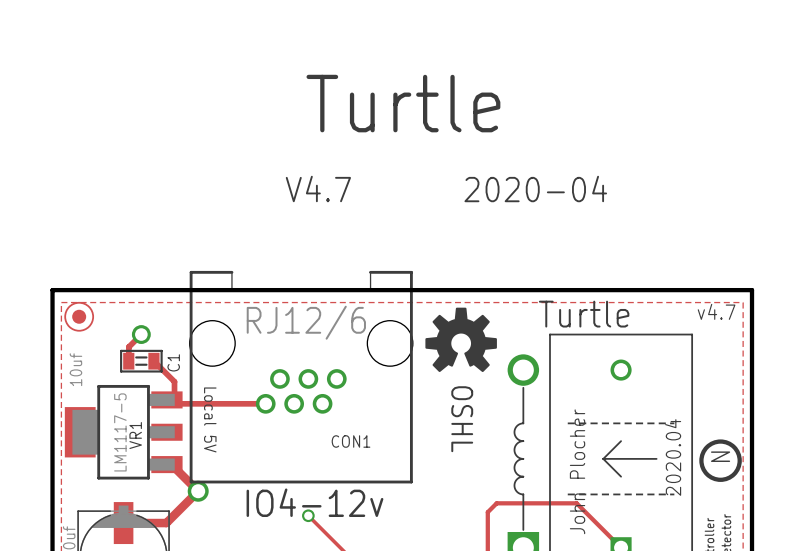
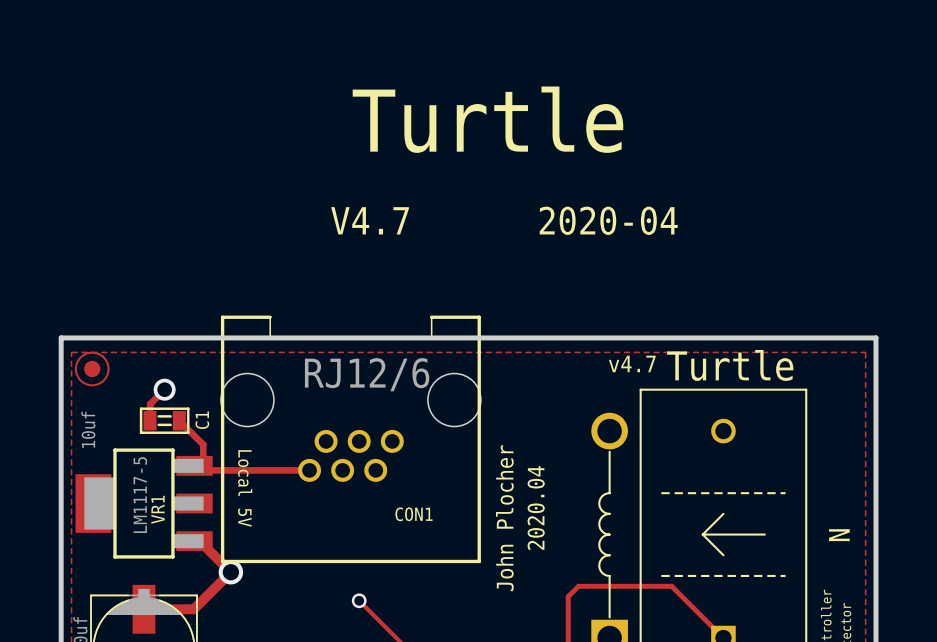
drawing: [425, 307, 497, 373] -> none
text position: v4.7 (716, 311) -> v4.7 (632, 363)
text position: Turtle (584, 314) -> Turtle (730, 365)
text: OSHL (462, 419) -> none
drawing: [699, 439, 742, 482] -> none
text position: 2020.04 (673, 457) -> 2020.04 (536, 508)
text position: John Plocher (577, 471) -> John Plocher (504, 518)
text: IO4-12v (314, 502) -> none

